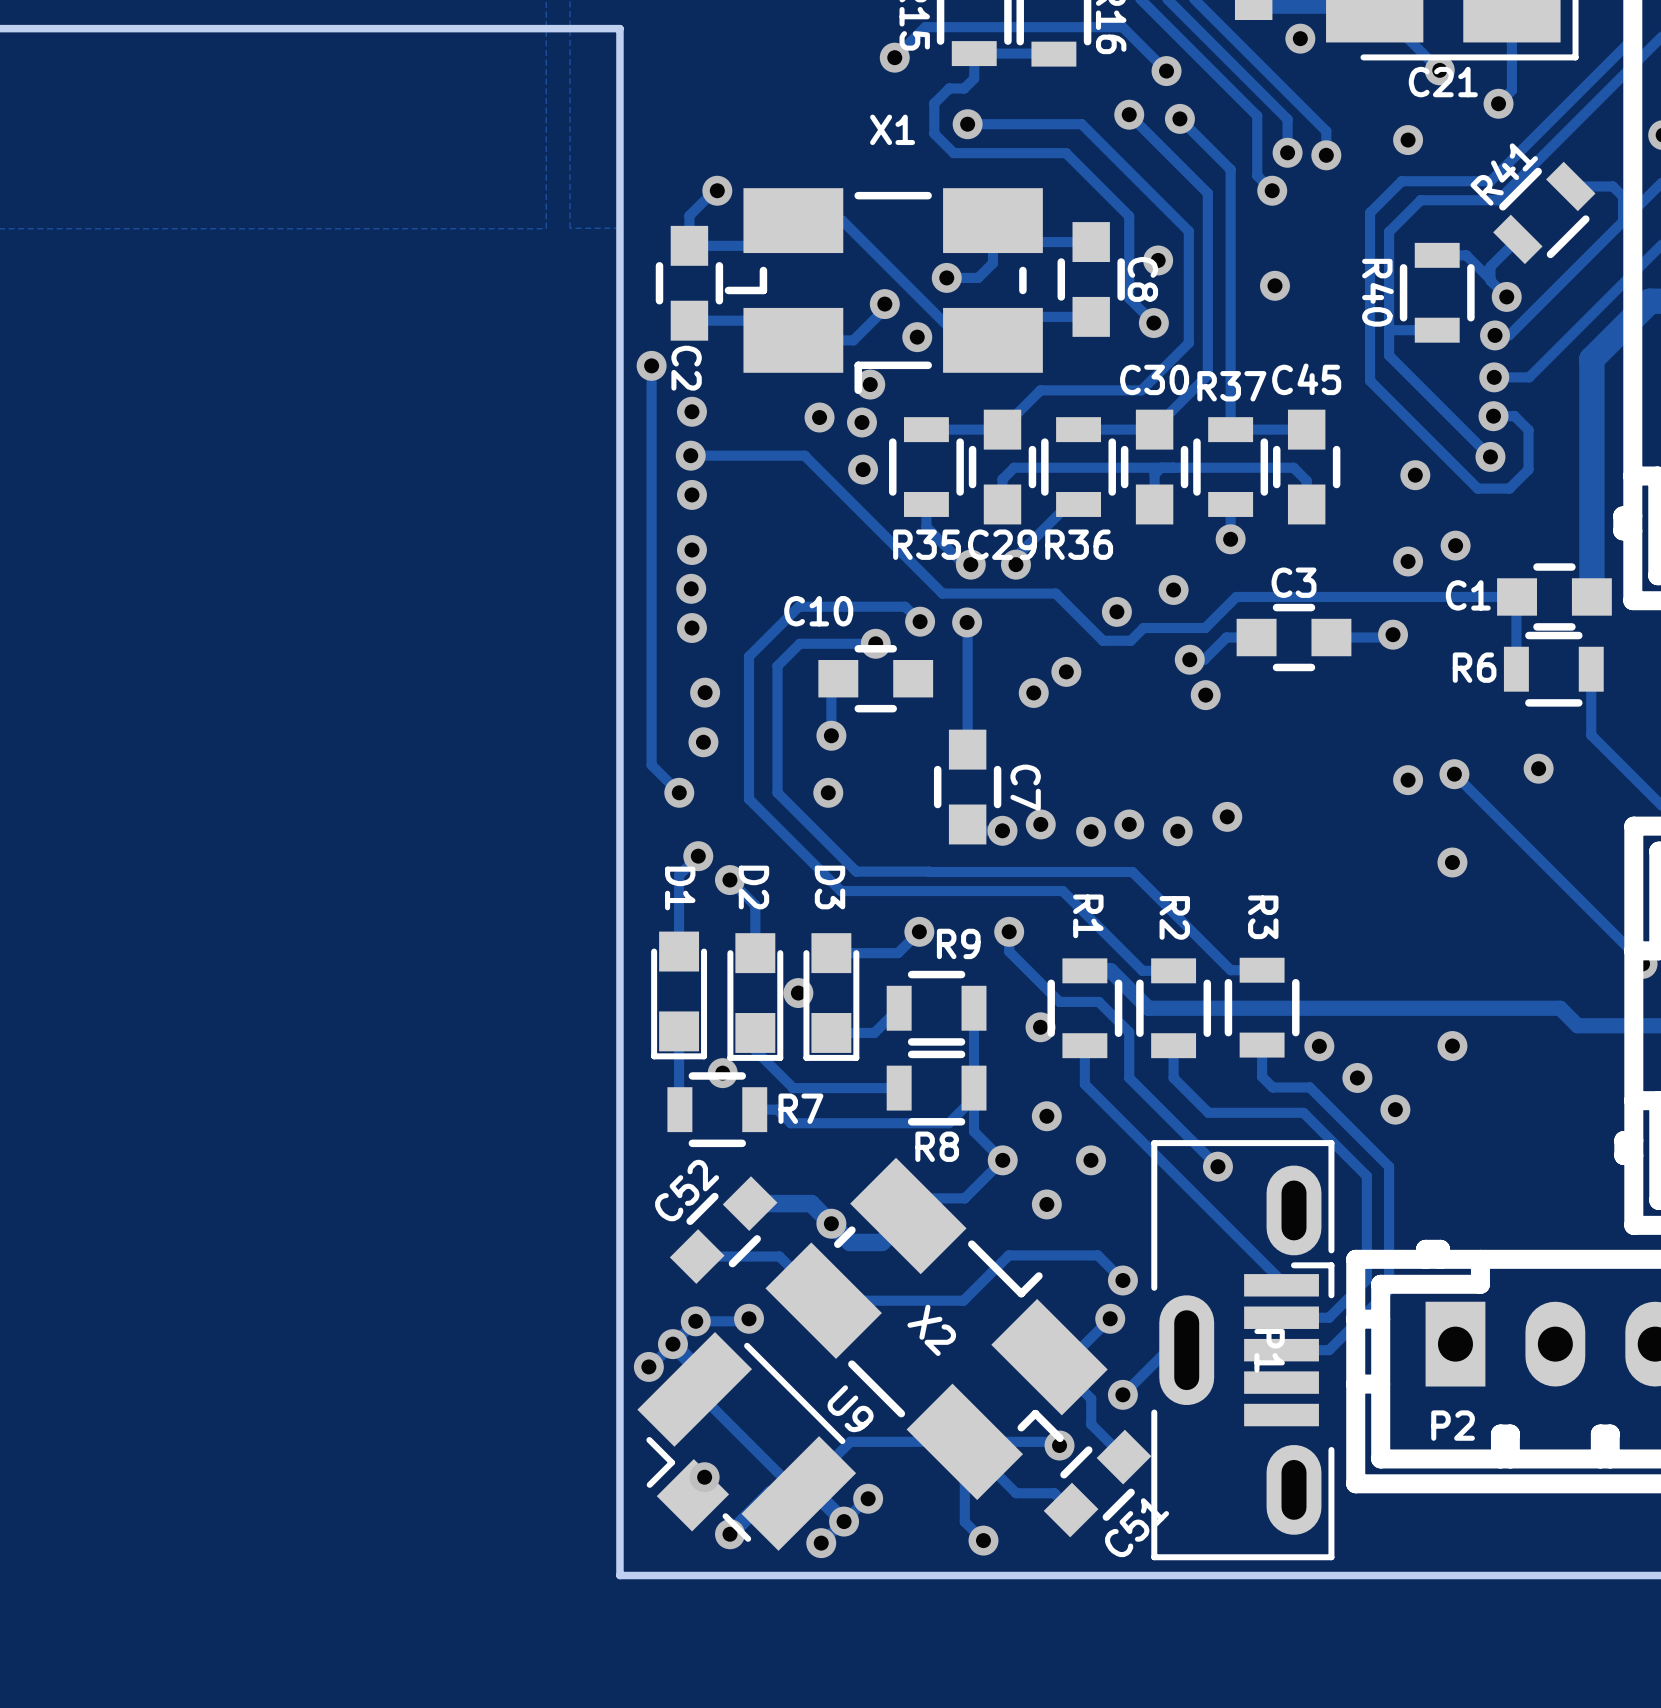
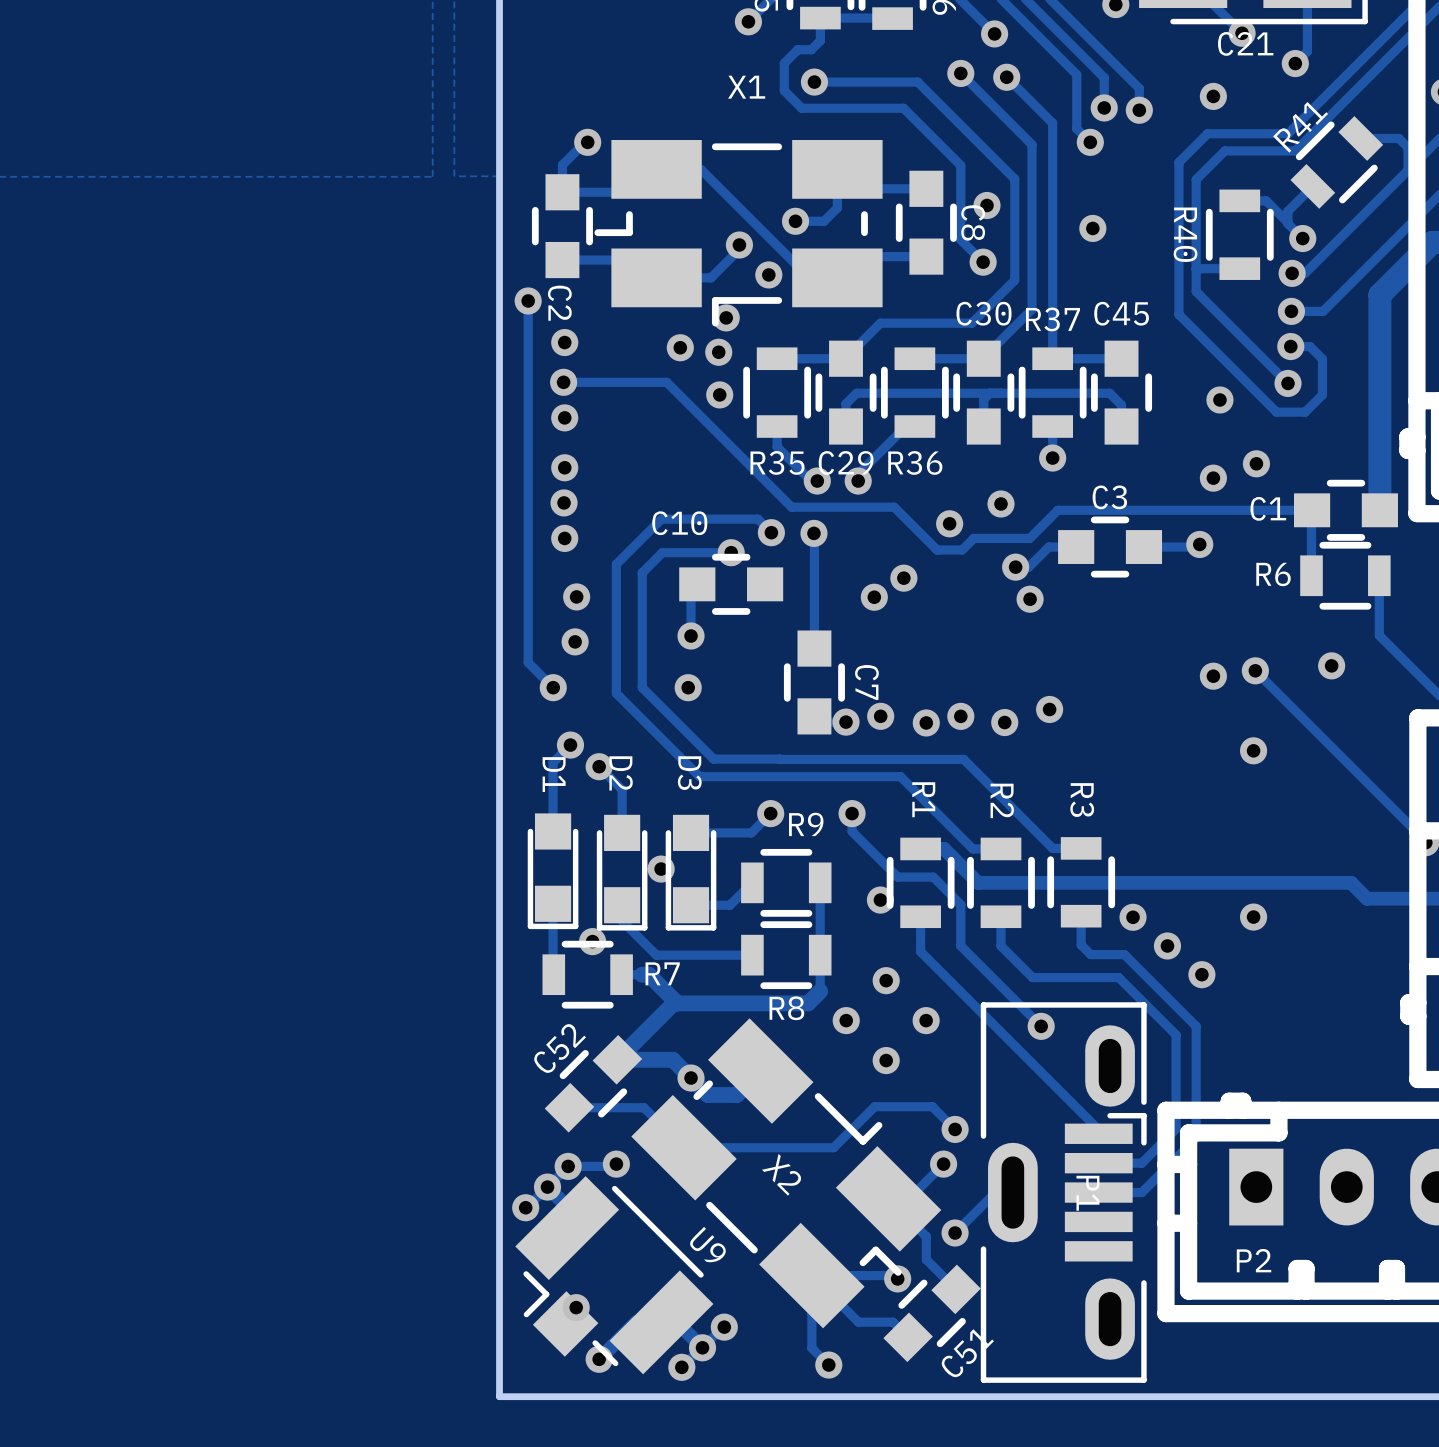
track: (974, 1098) (948, 1123) (790, 1123) (777, 1109) -> (677, 1003) (648, 974) (642, 974)
track: (974, 1128) (974, 1131) (1002, 1160) (964, 1198) (925, 1198) (908, 1216) (947, 1216) -> (820, 991) (808, 1003) (673, 1003) (617, 1059)
track: (1034, 1255) (1008, 1255) (963, 1300) -> (874, 1106) (833, 1147) (810, 1147)
track: (694, 1389) (798, 1493) (850, 1441) (964, 1441) -> none

